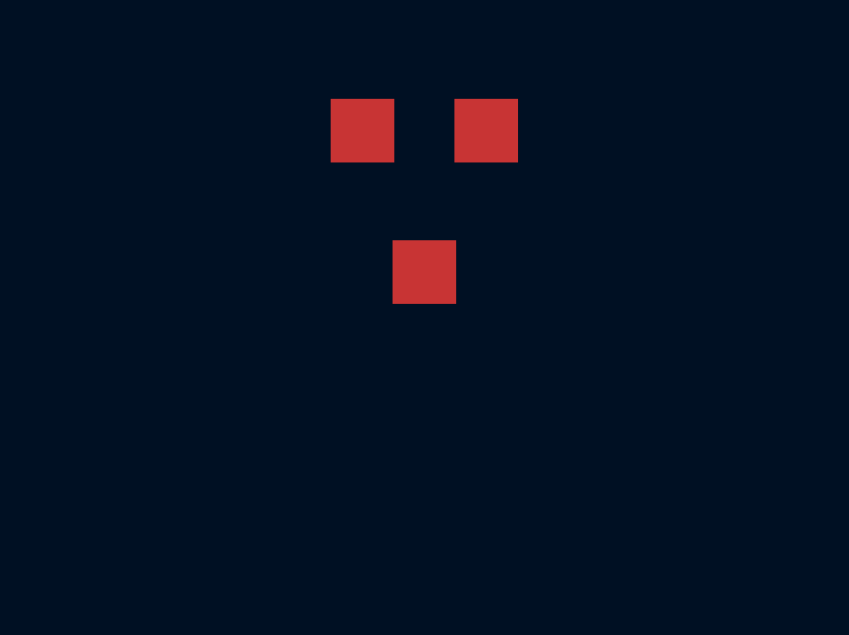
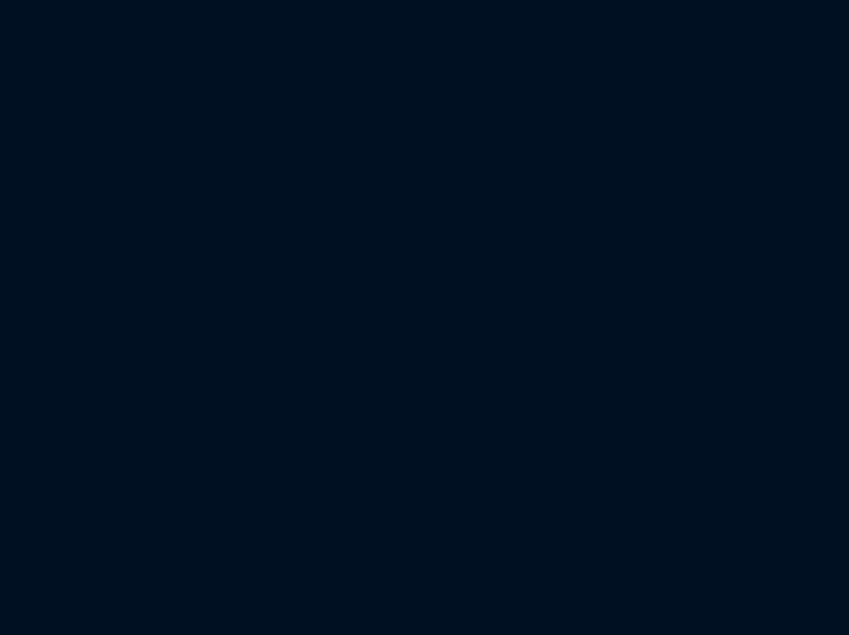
part: (424, 201) -> none

